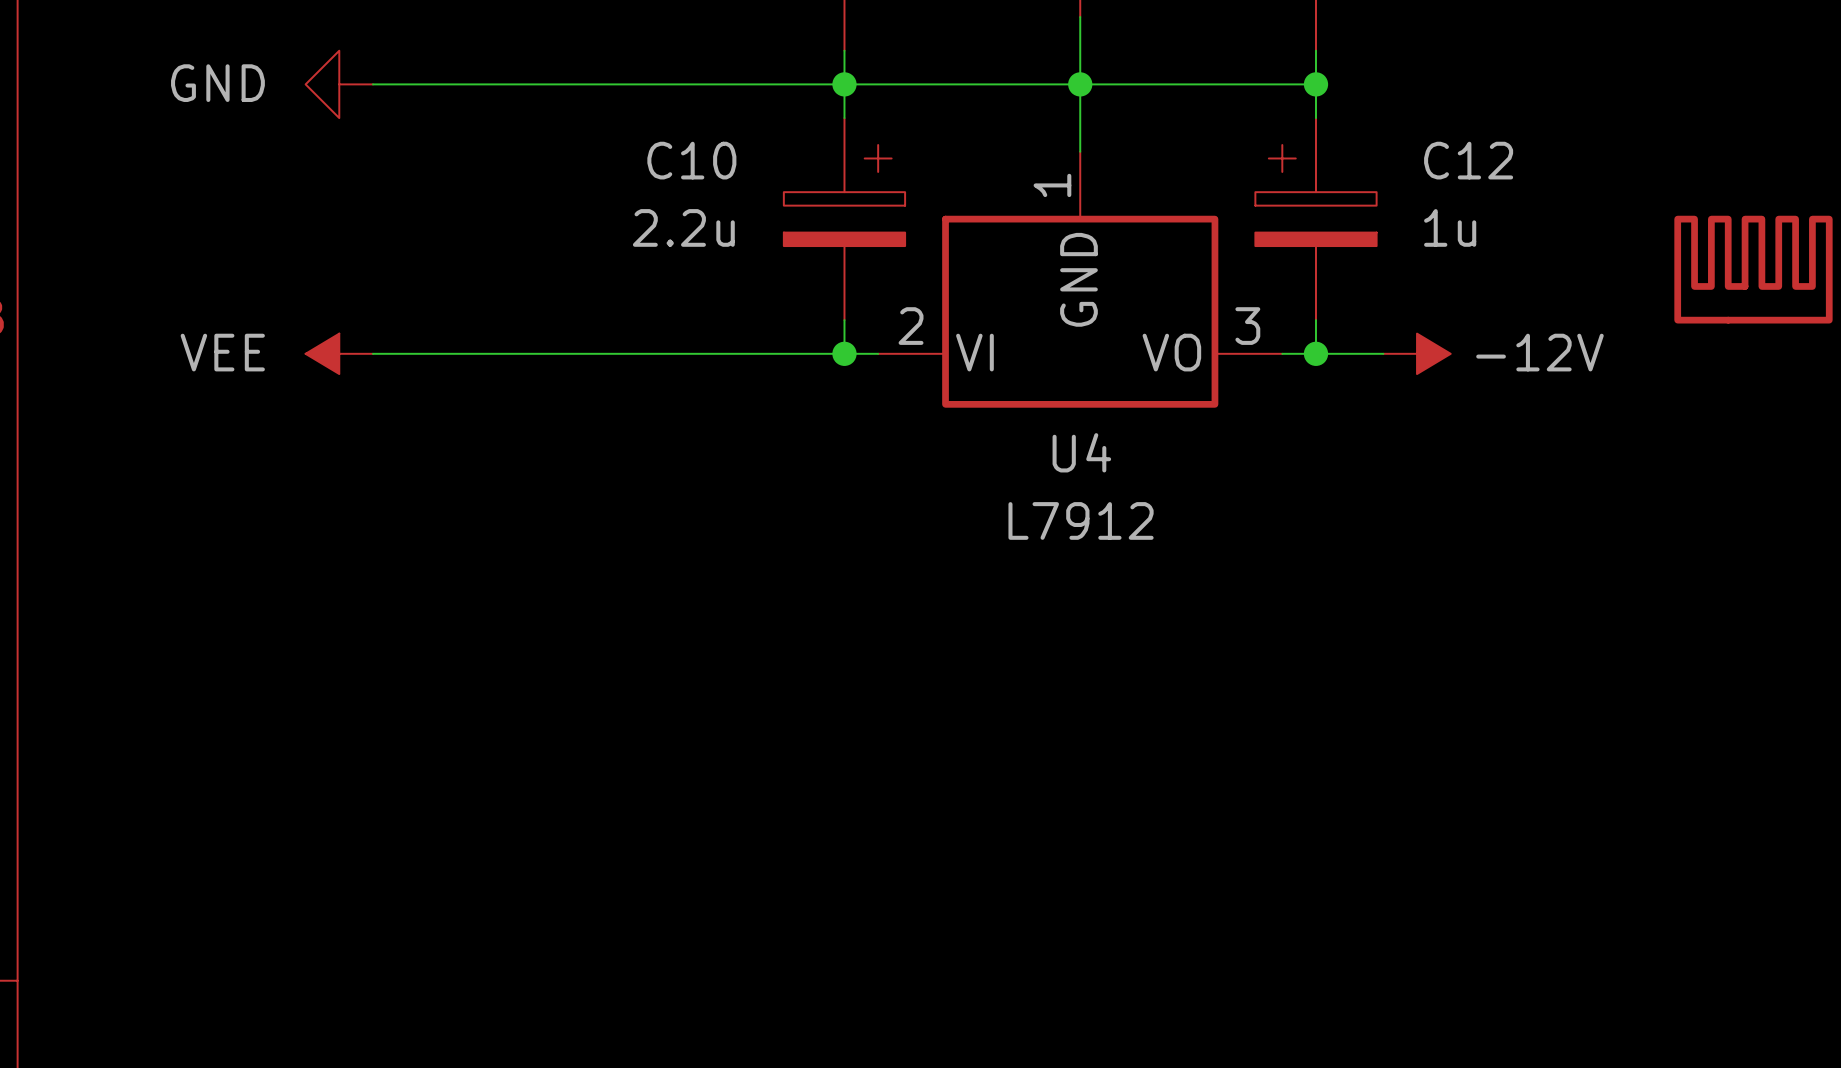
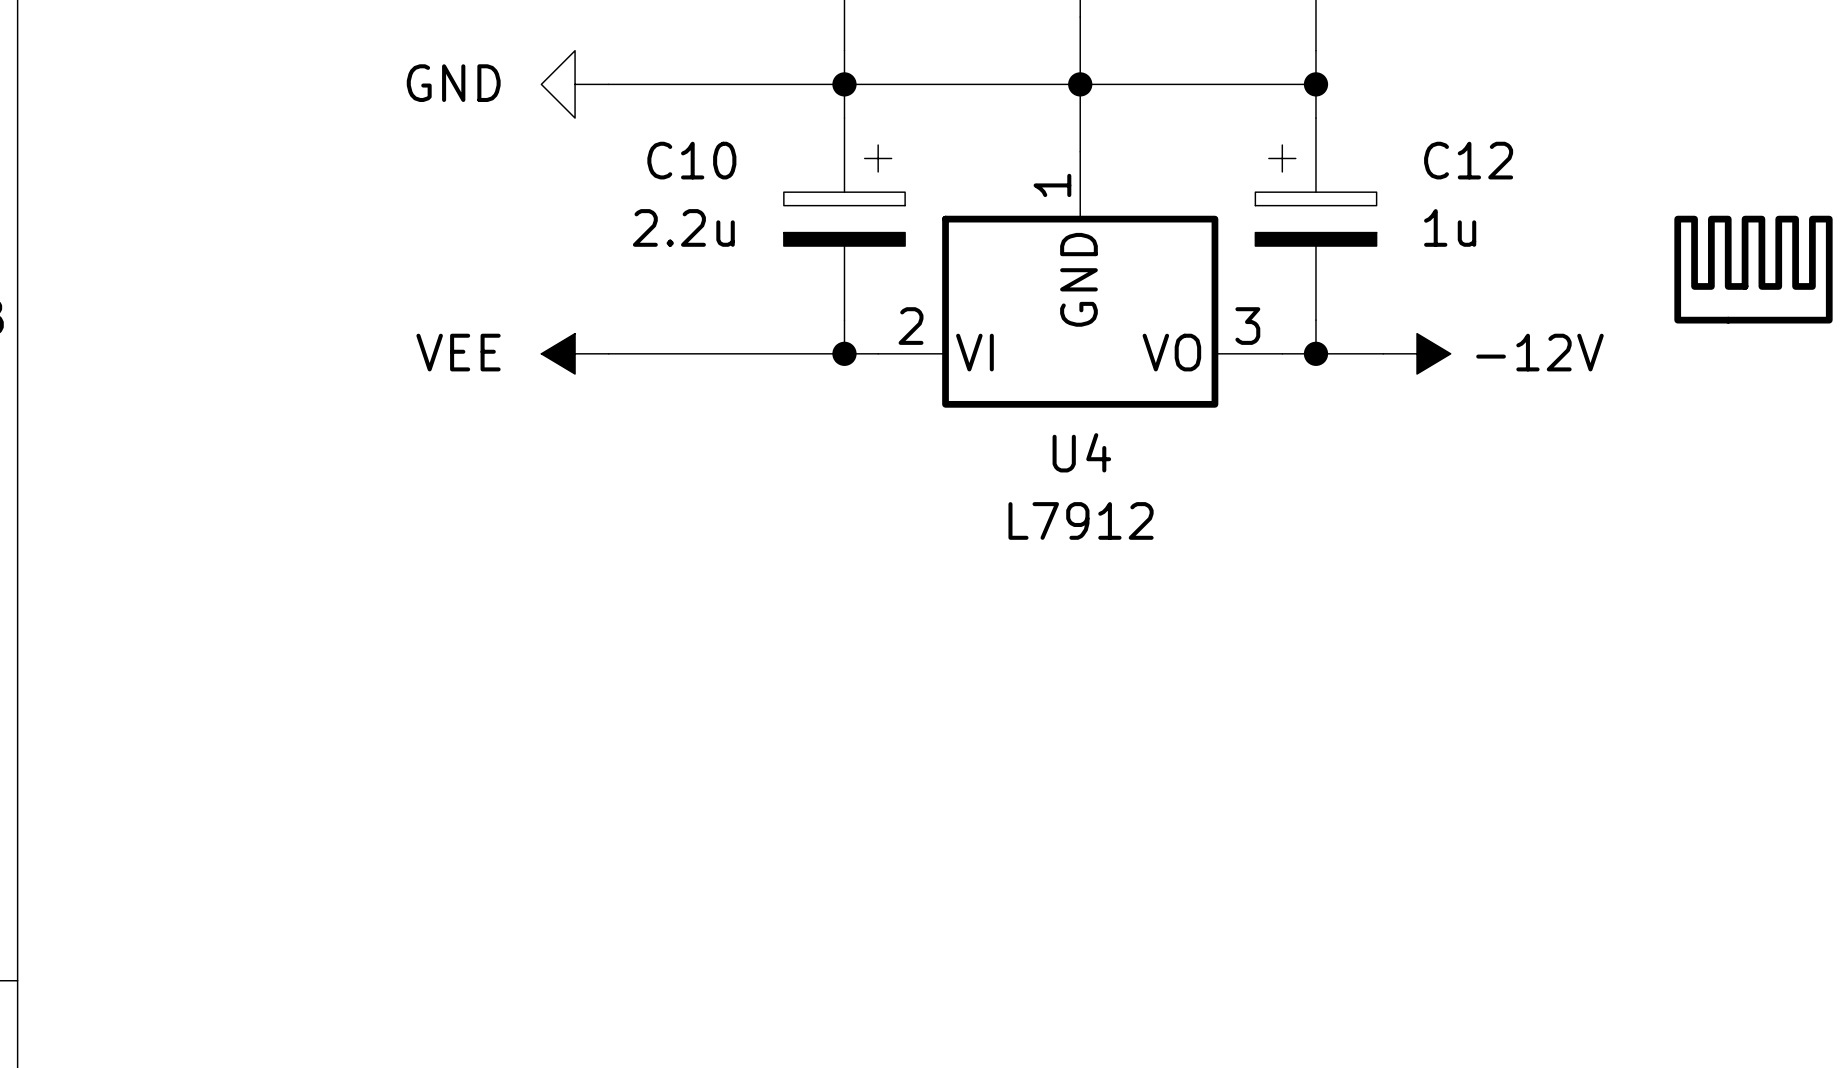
power symbol position: GND (339, 84) -> GND (575, 84)
wire: (372, 84) (608, 84) -> none
power symbol position: VEE (339, 353) -> VEE (575, 353)
wire: (372, 353) (608, 353) -> none

